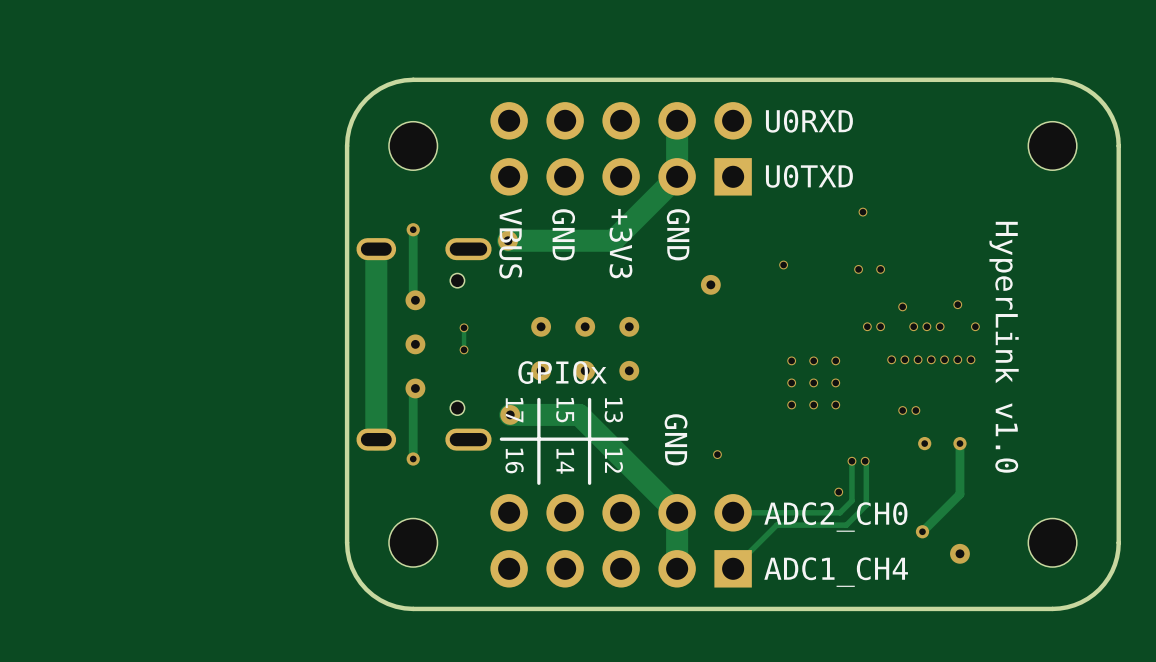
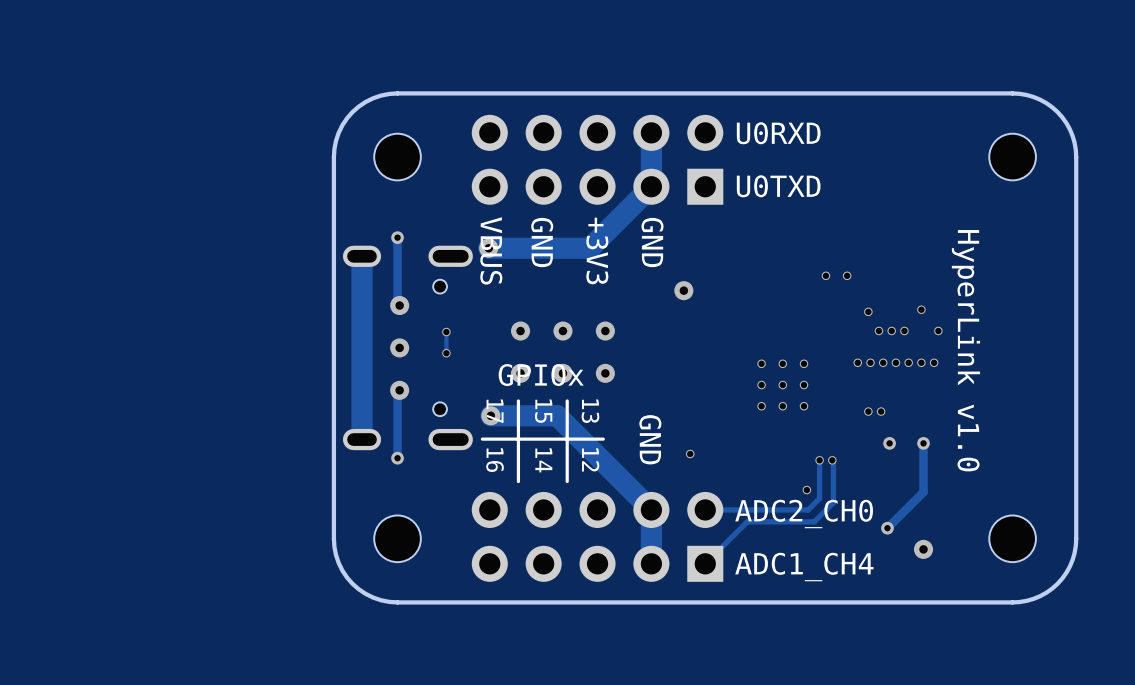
via: (862, 212) -> none
via: (783, 265) -> none
via: (867, 326) -> none
via: (880, 326) -> none

